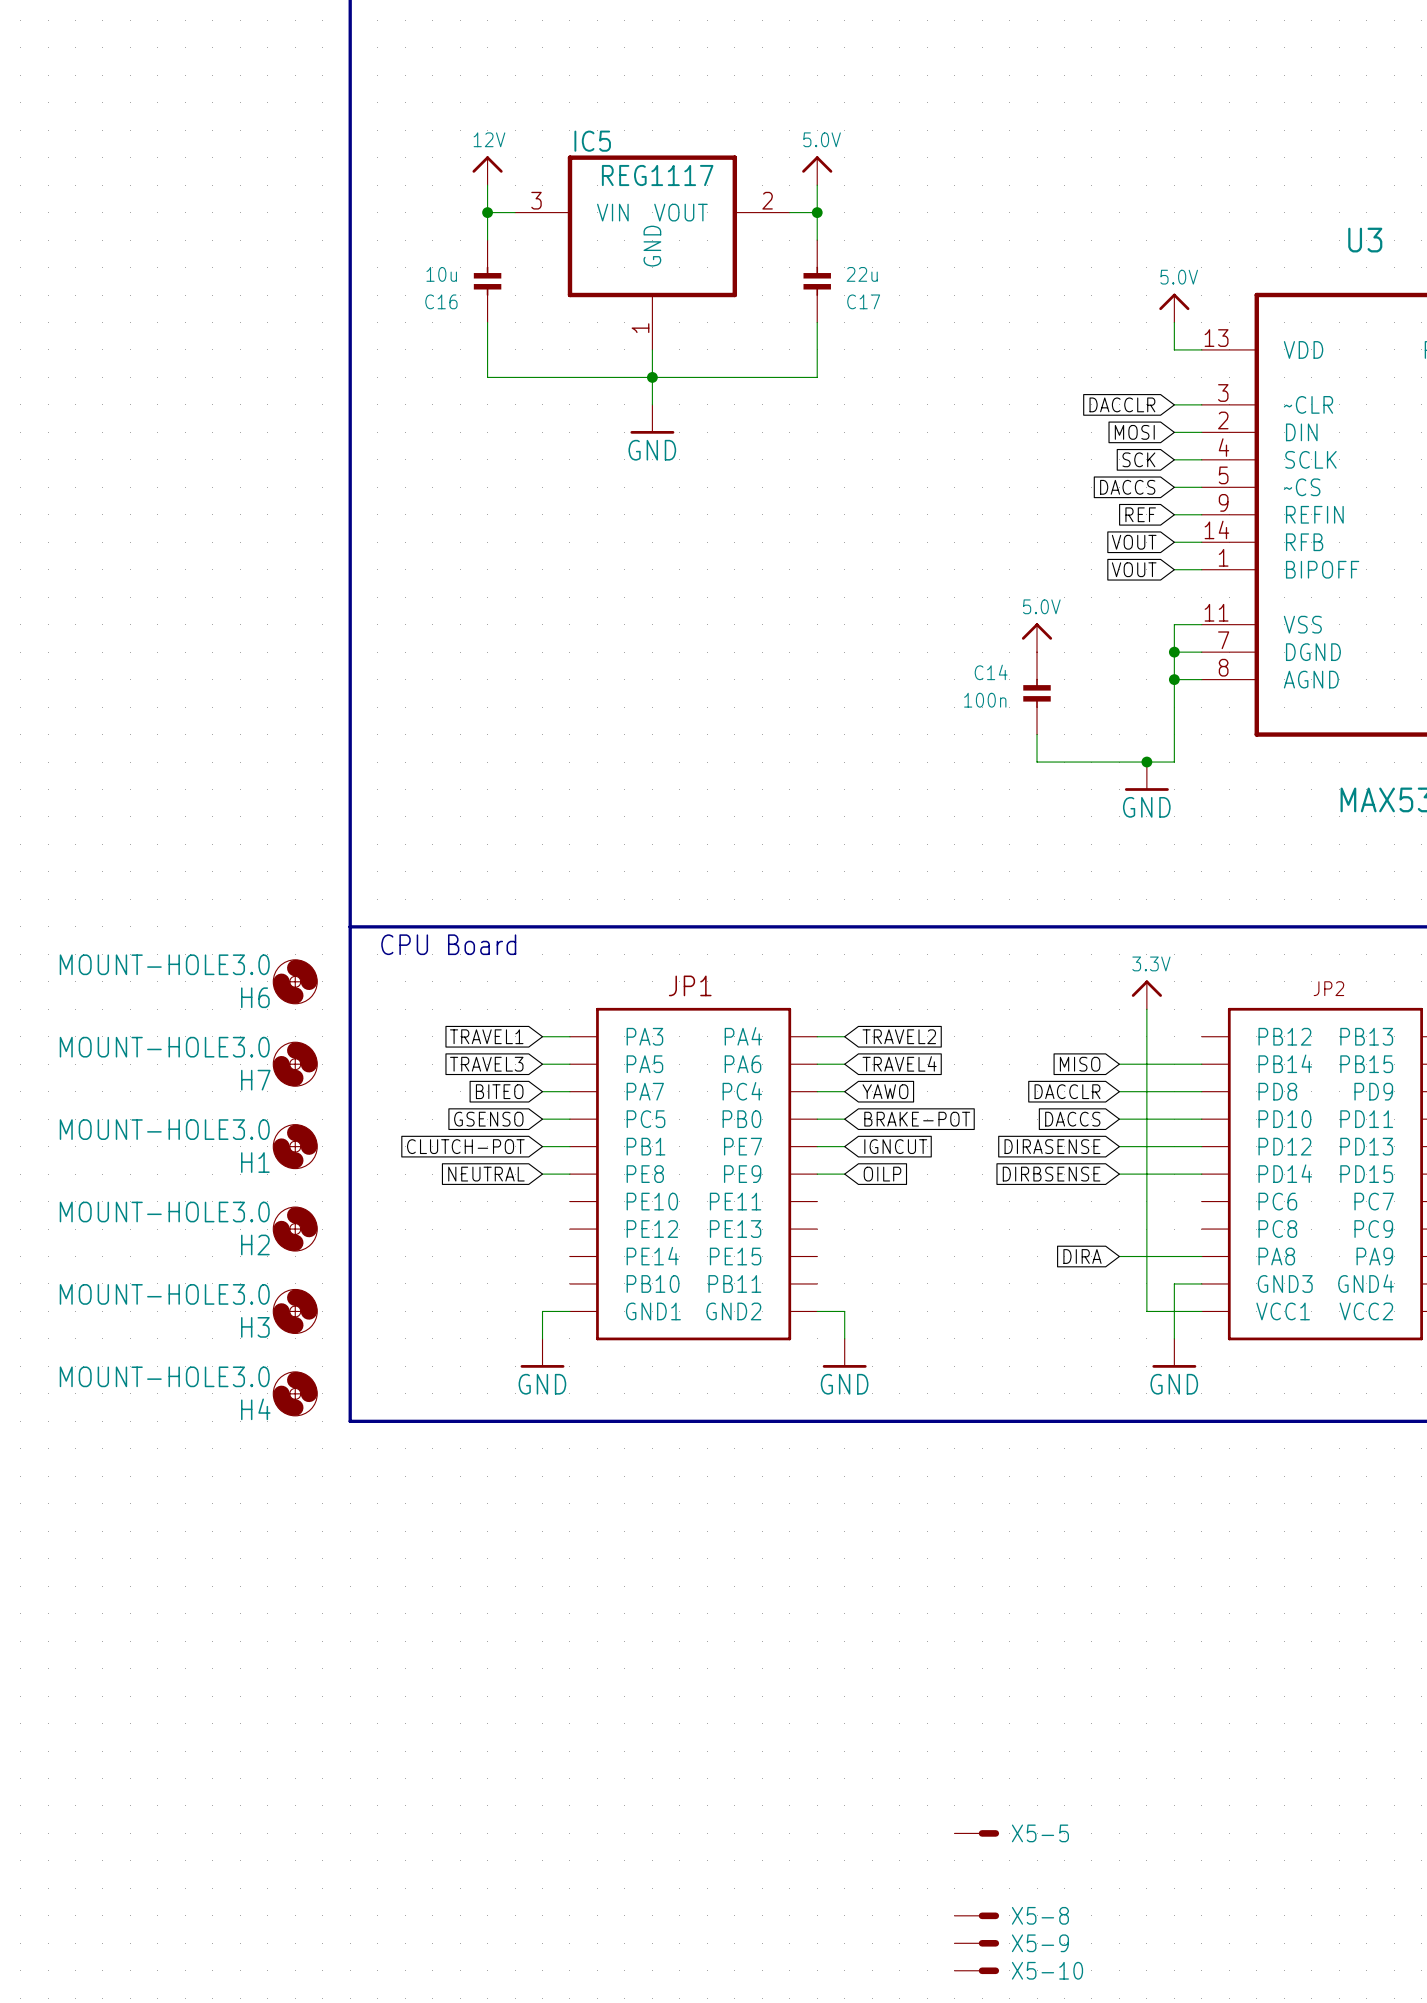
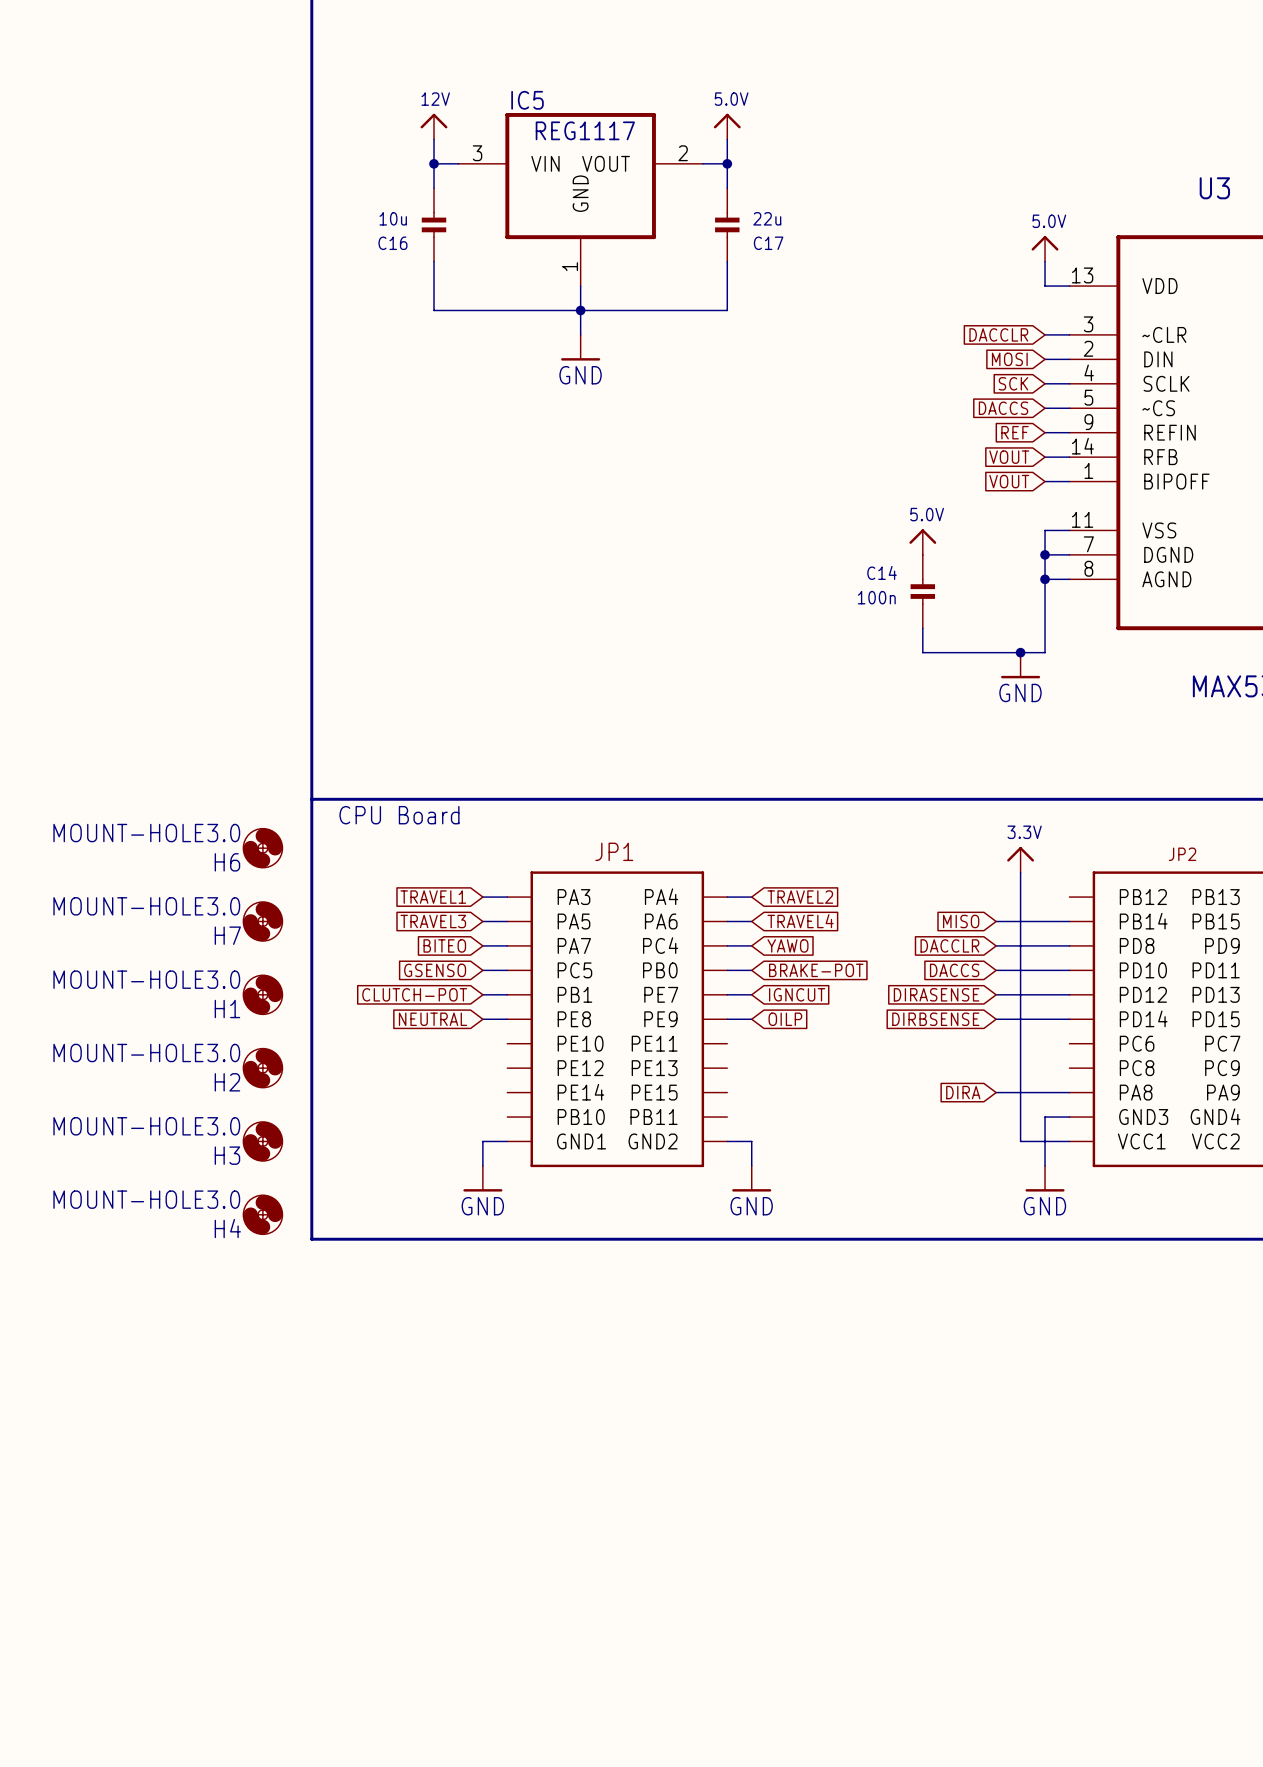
X5-5: (976, 1833) -> none
X5-8: (976, 1915) -> none
X5-9: (976, 1943) -> none
X5-10: (976, 1970) -> none

